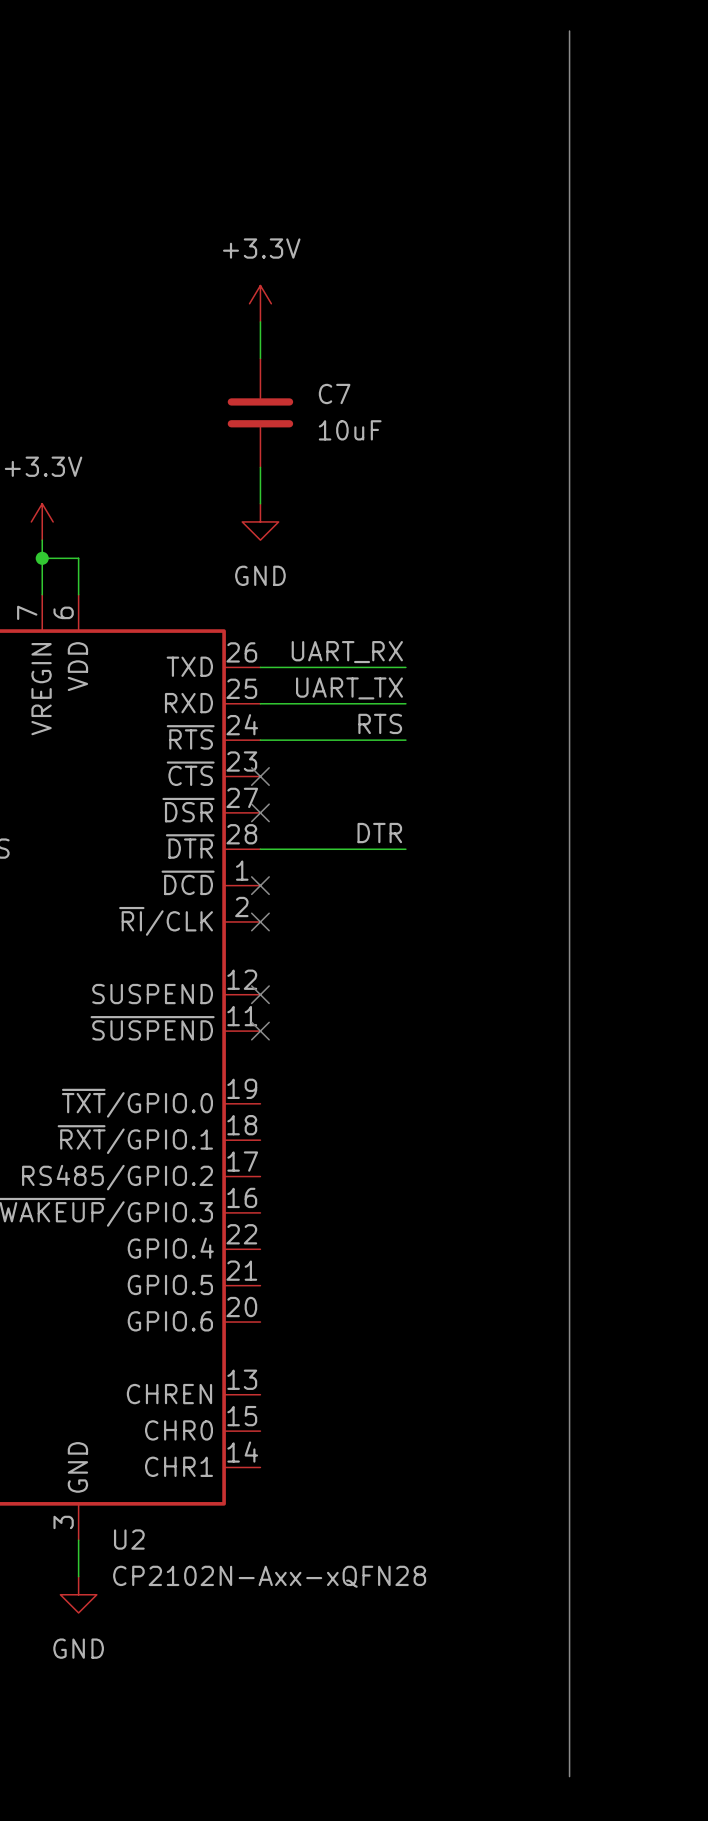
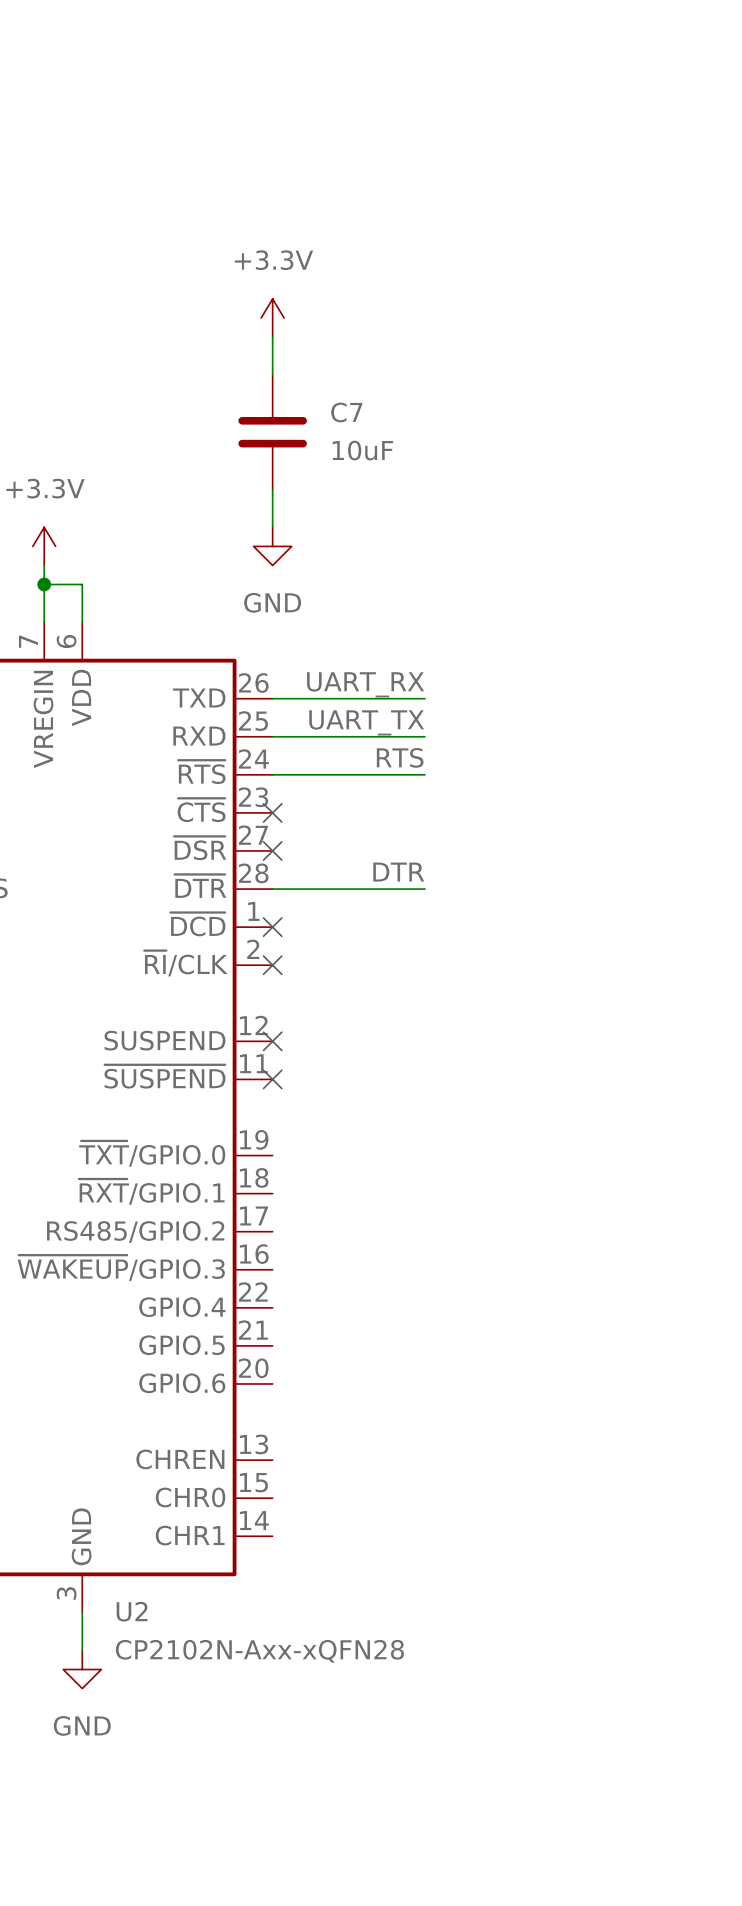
line: (569, 31) (569, 1776) -> none

